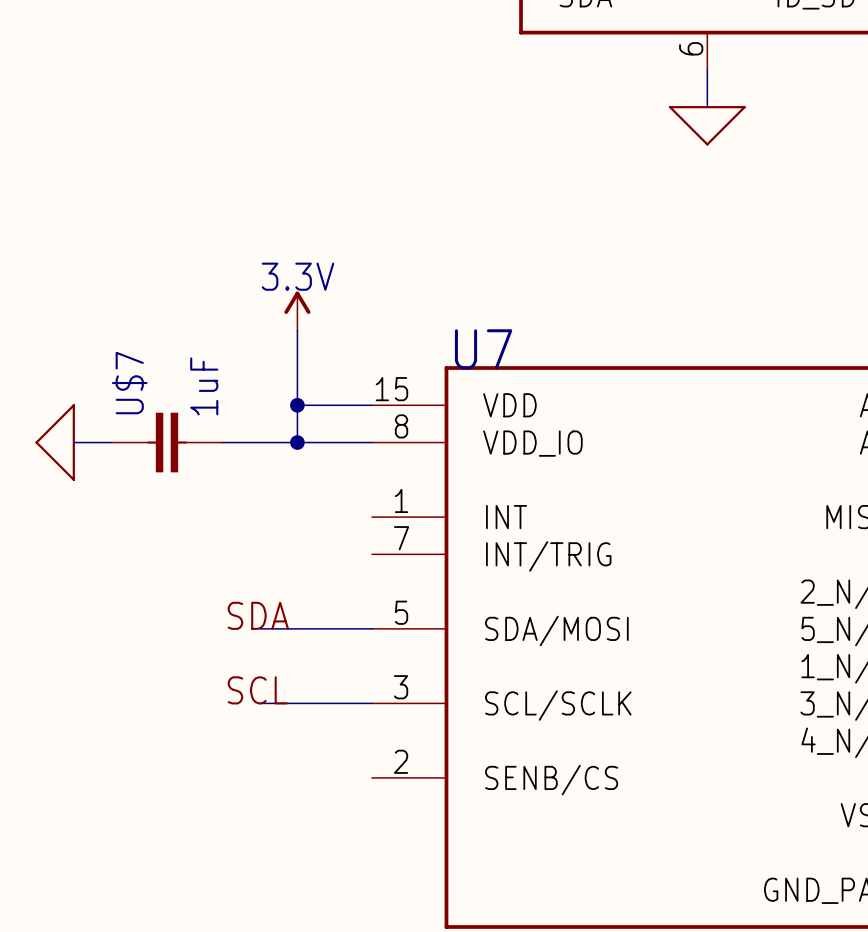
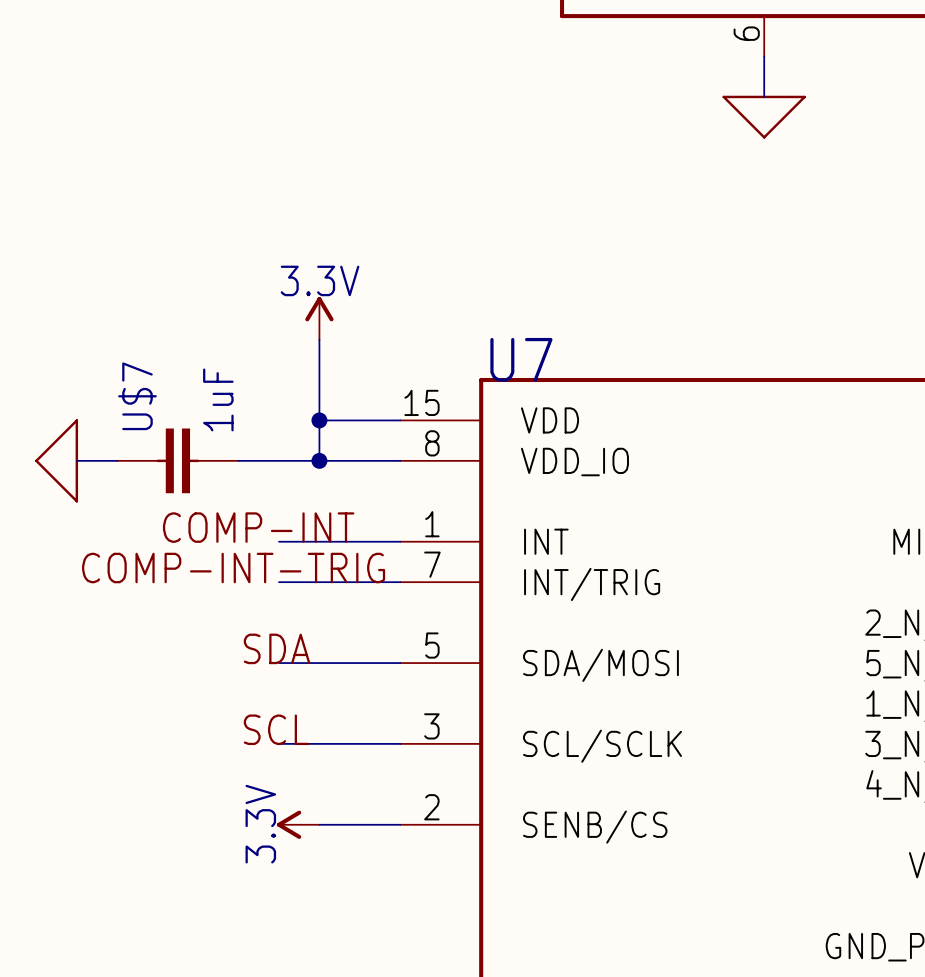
label: none -> COMP-INT (258, 527)
wire: none -> (279, 541) (400, 541)
label: none -> COMP-INT-TRIG (233, 568)
wire: none -> (279, 582) (400, 582)
power symbol: none -> 3.3V (298, 824)
wire: none -> (319, 824) (400, 824)

